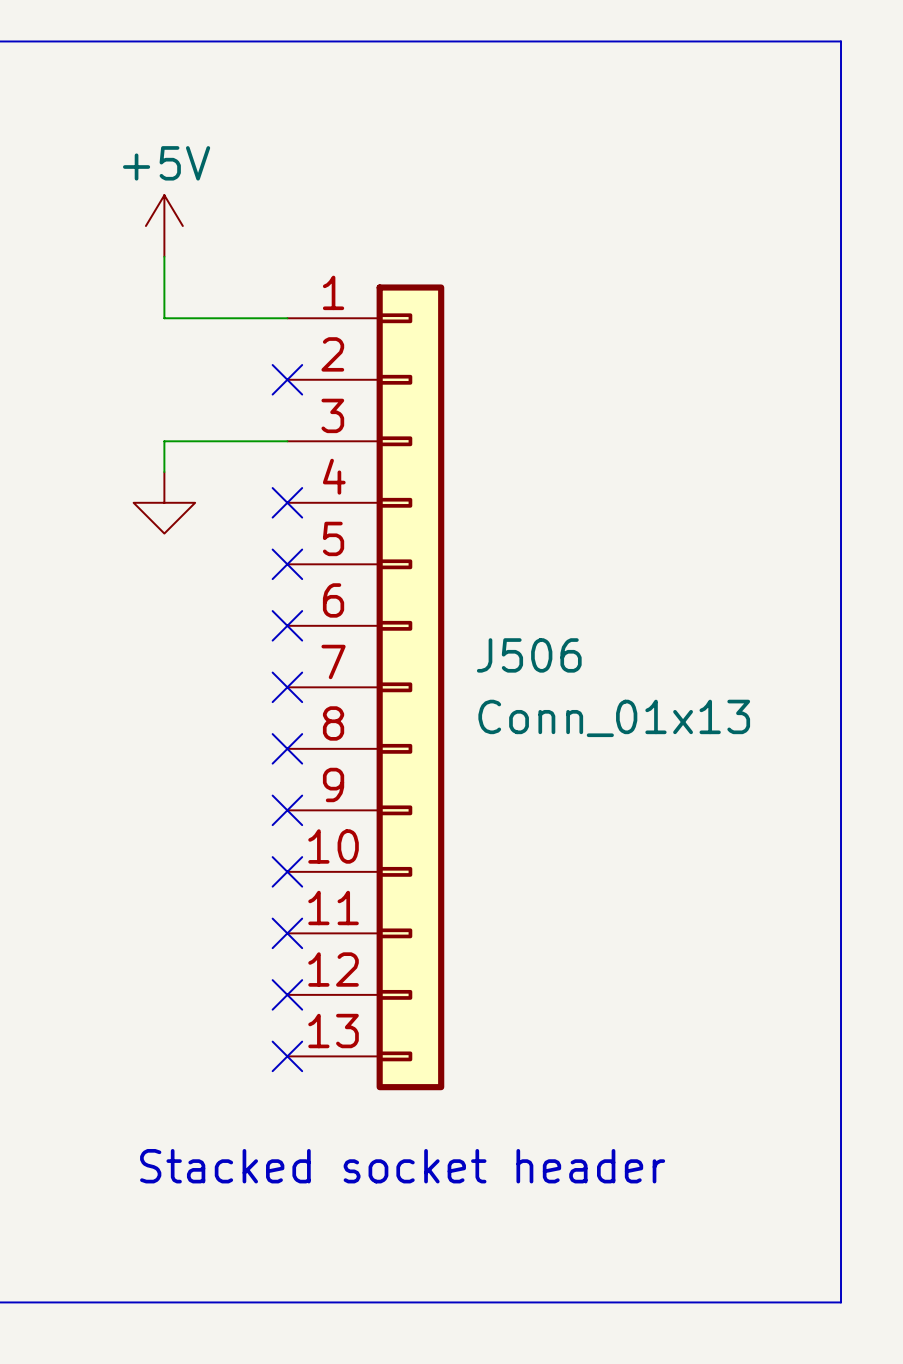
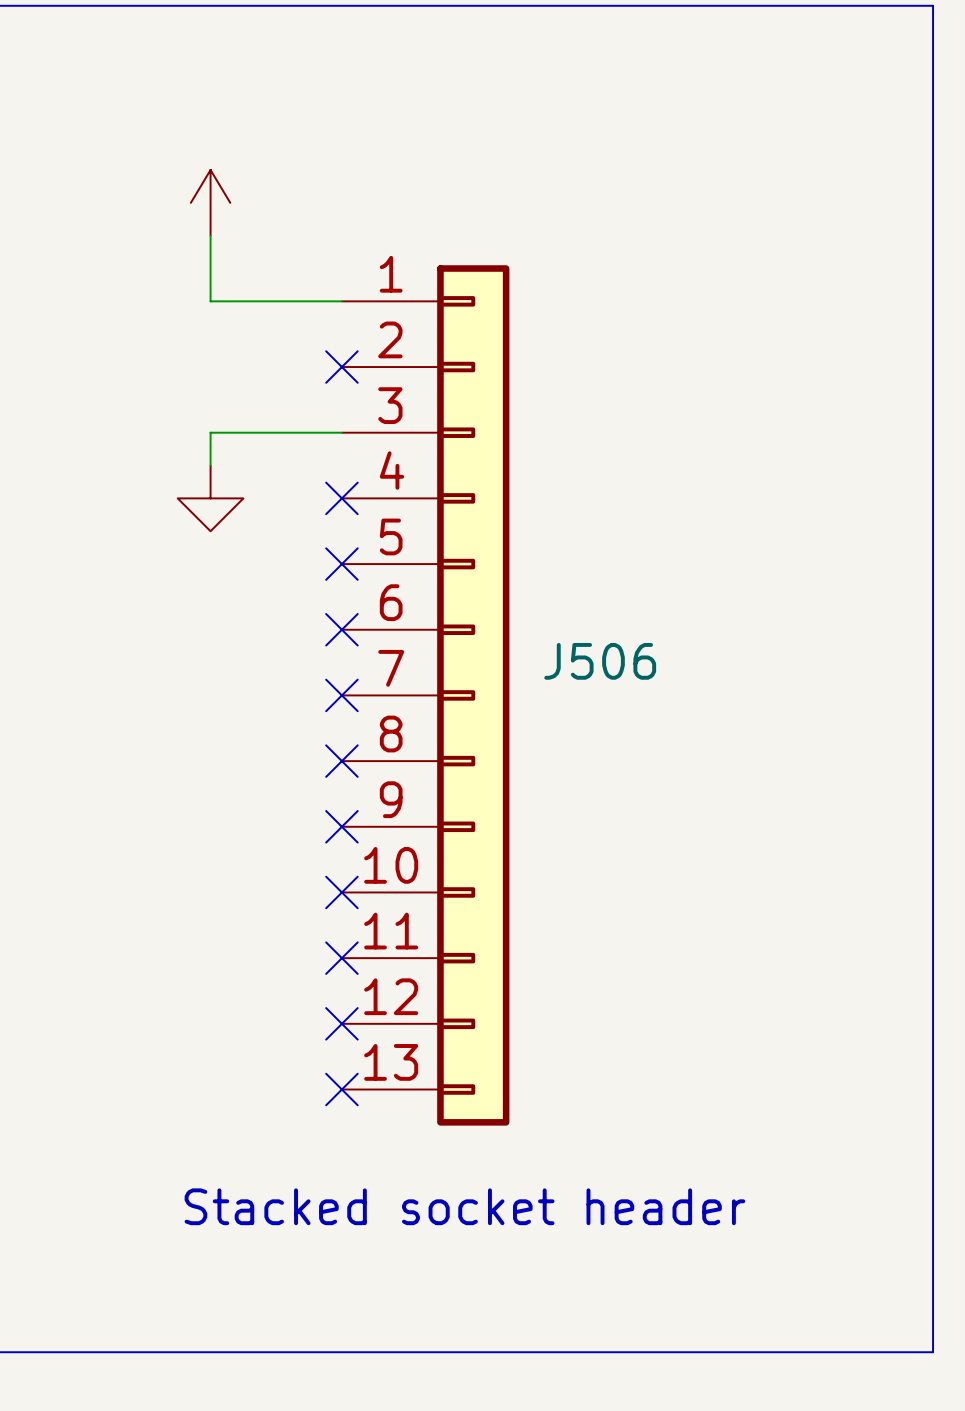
power symbol text: +5V (166, 163) -> none
J506 value: Conn_01x13 (614, 718) -> none

